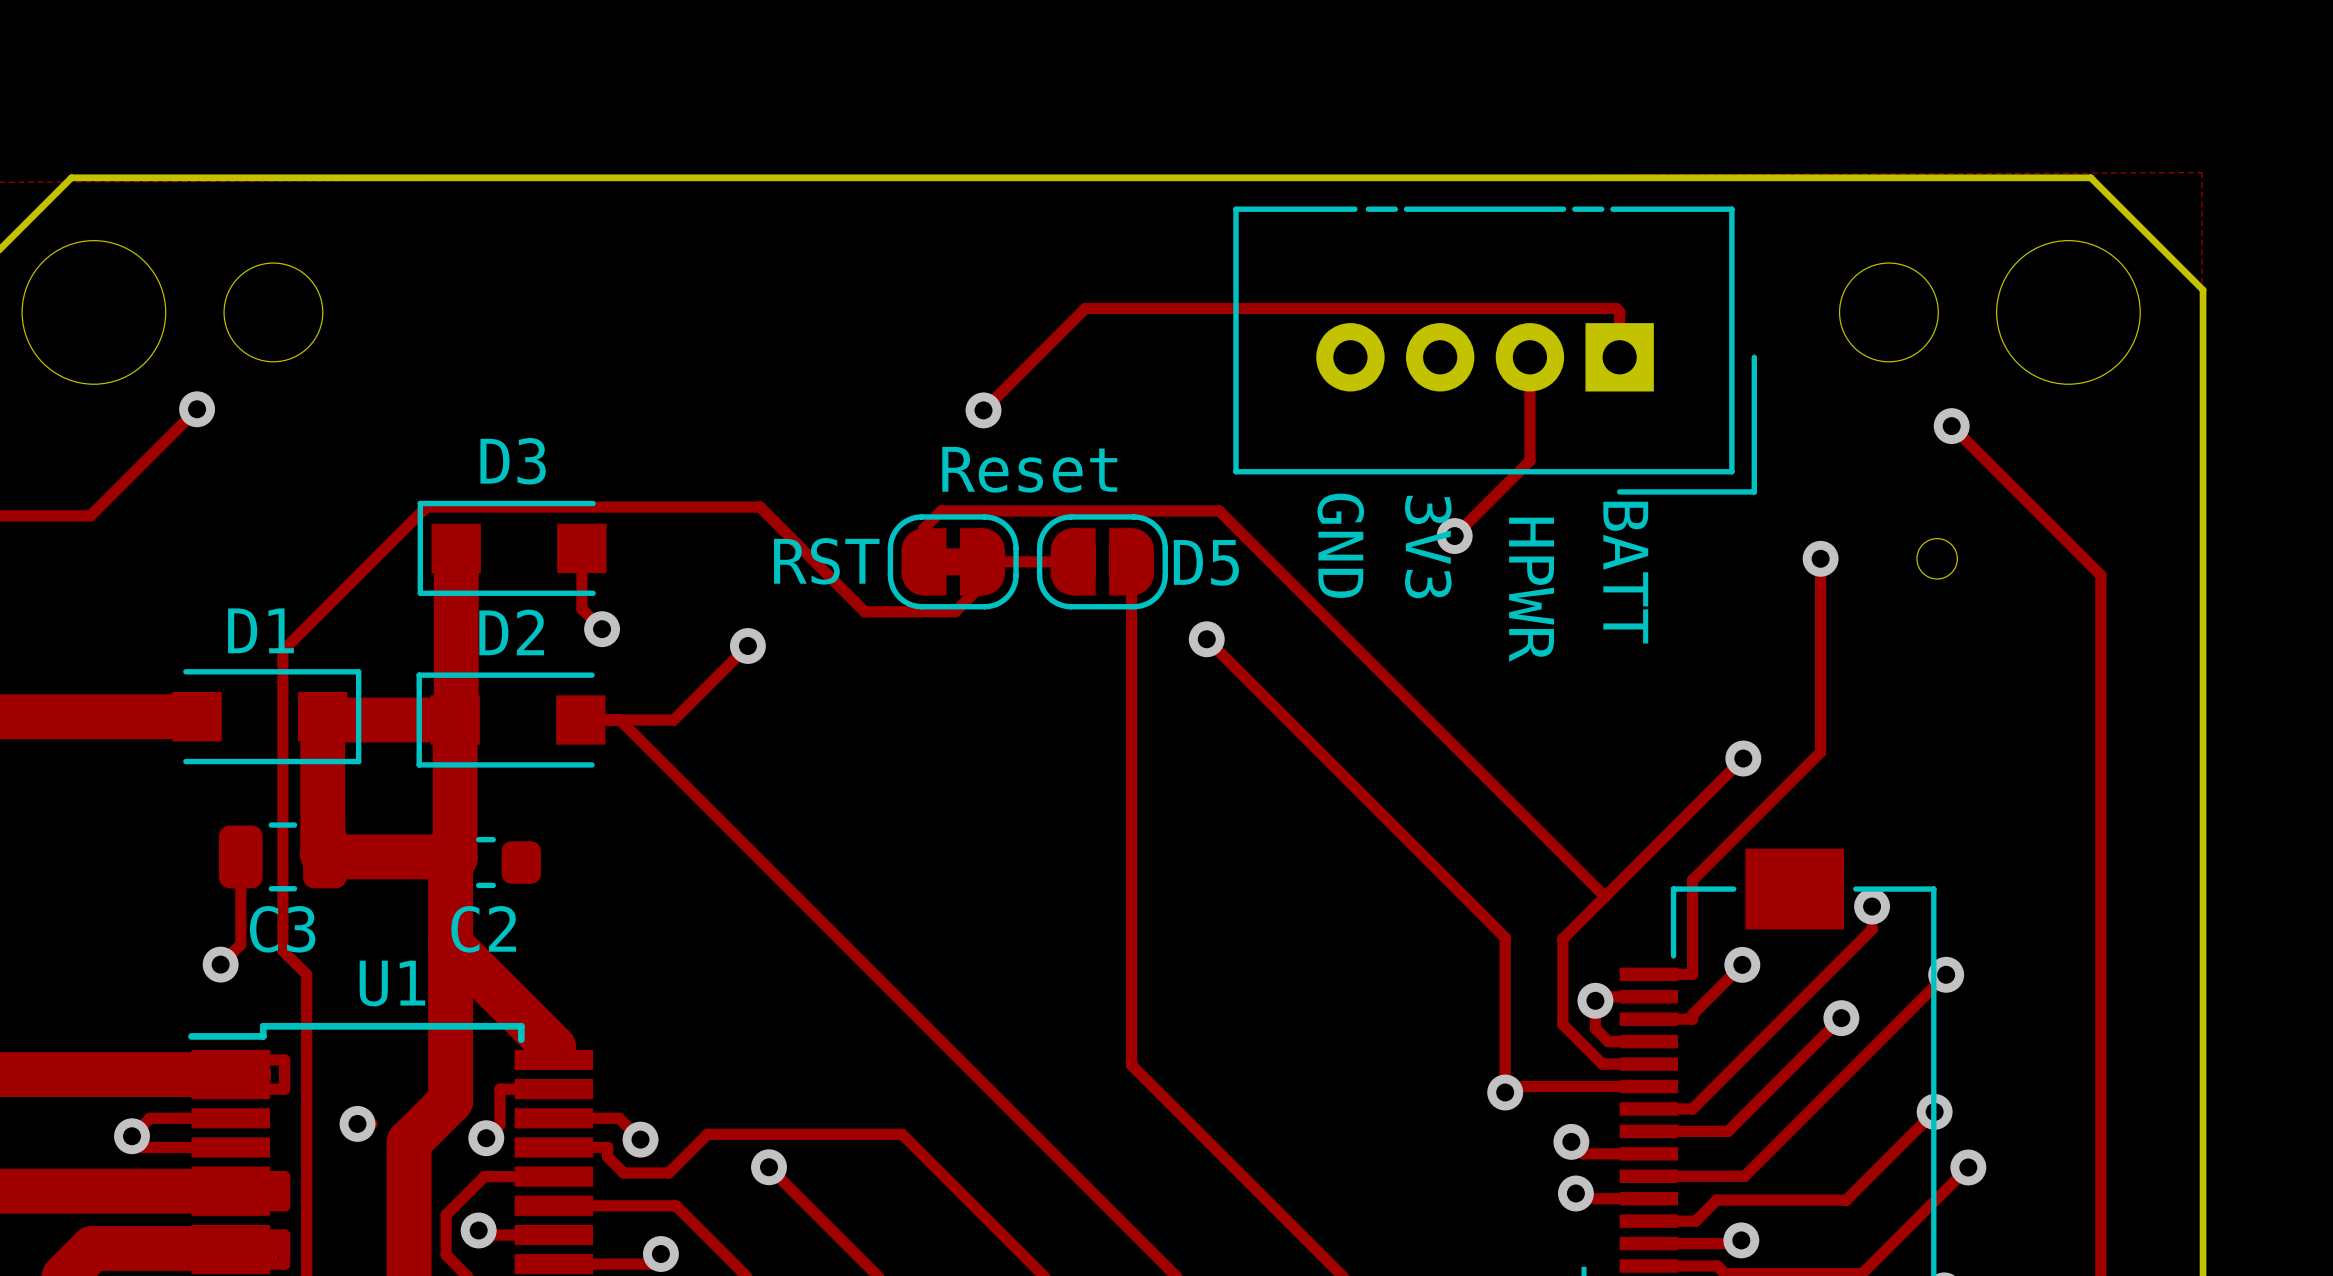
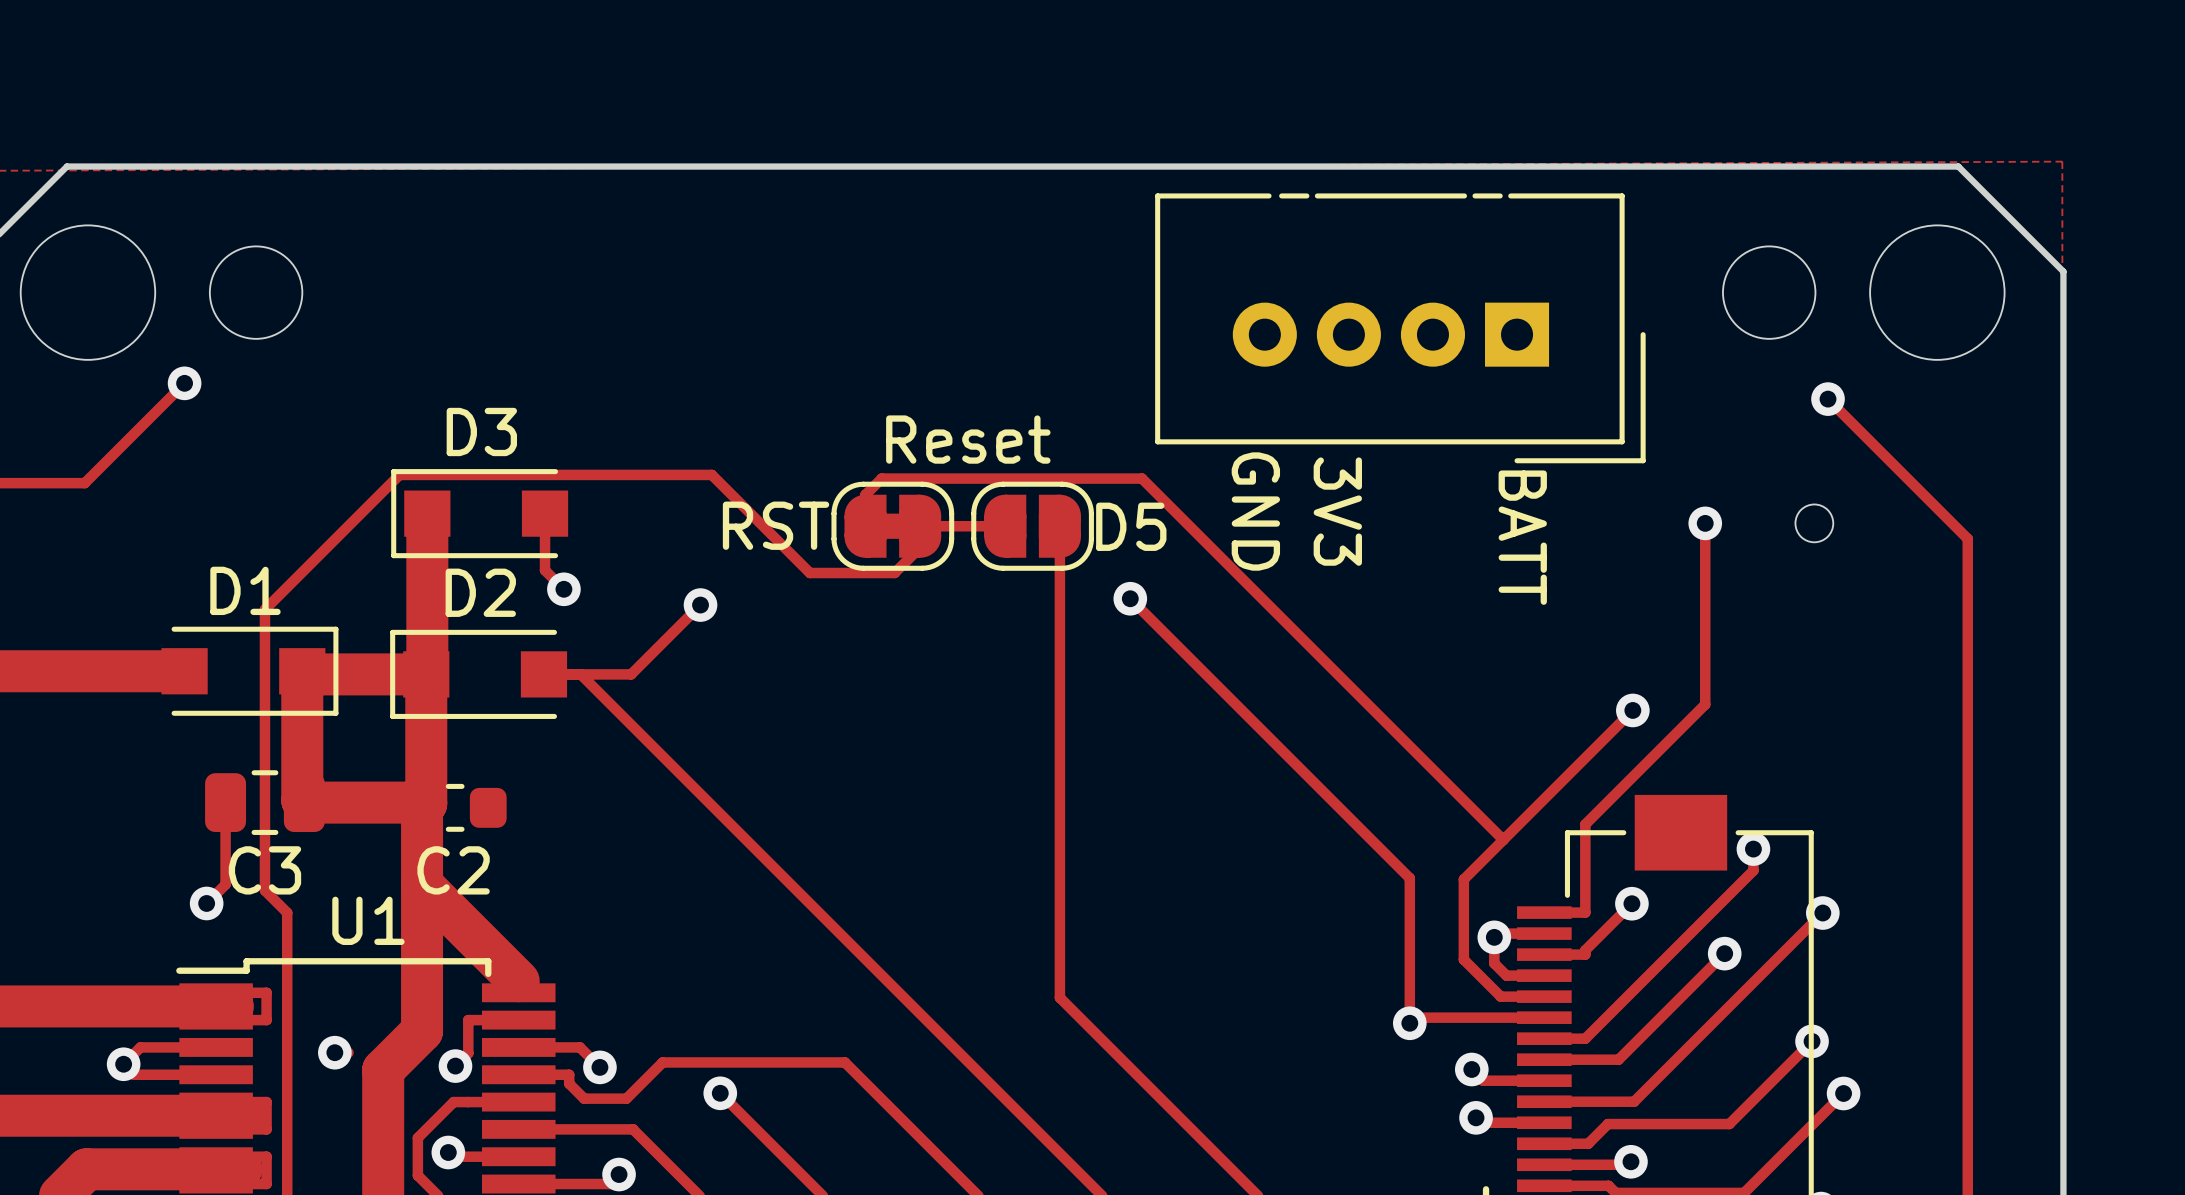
track: (1529, 357) (1529, 460) (1454, 536) -> none
track: (1619, 357) (1619, 311) (1616, 308) (1085, 308) (983, 410) -> none
via: (983, 410) -> none
via: (1454, 536) -> none
text: HPWR (1531, 589) -> none

